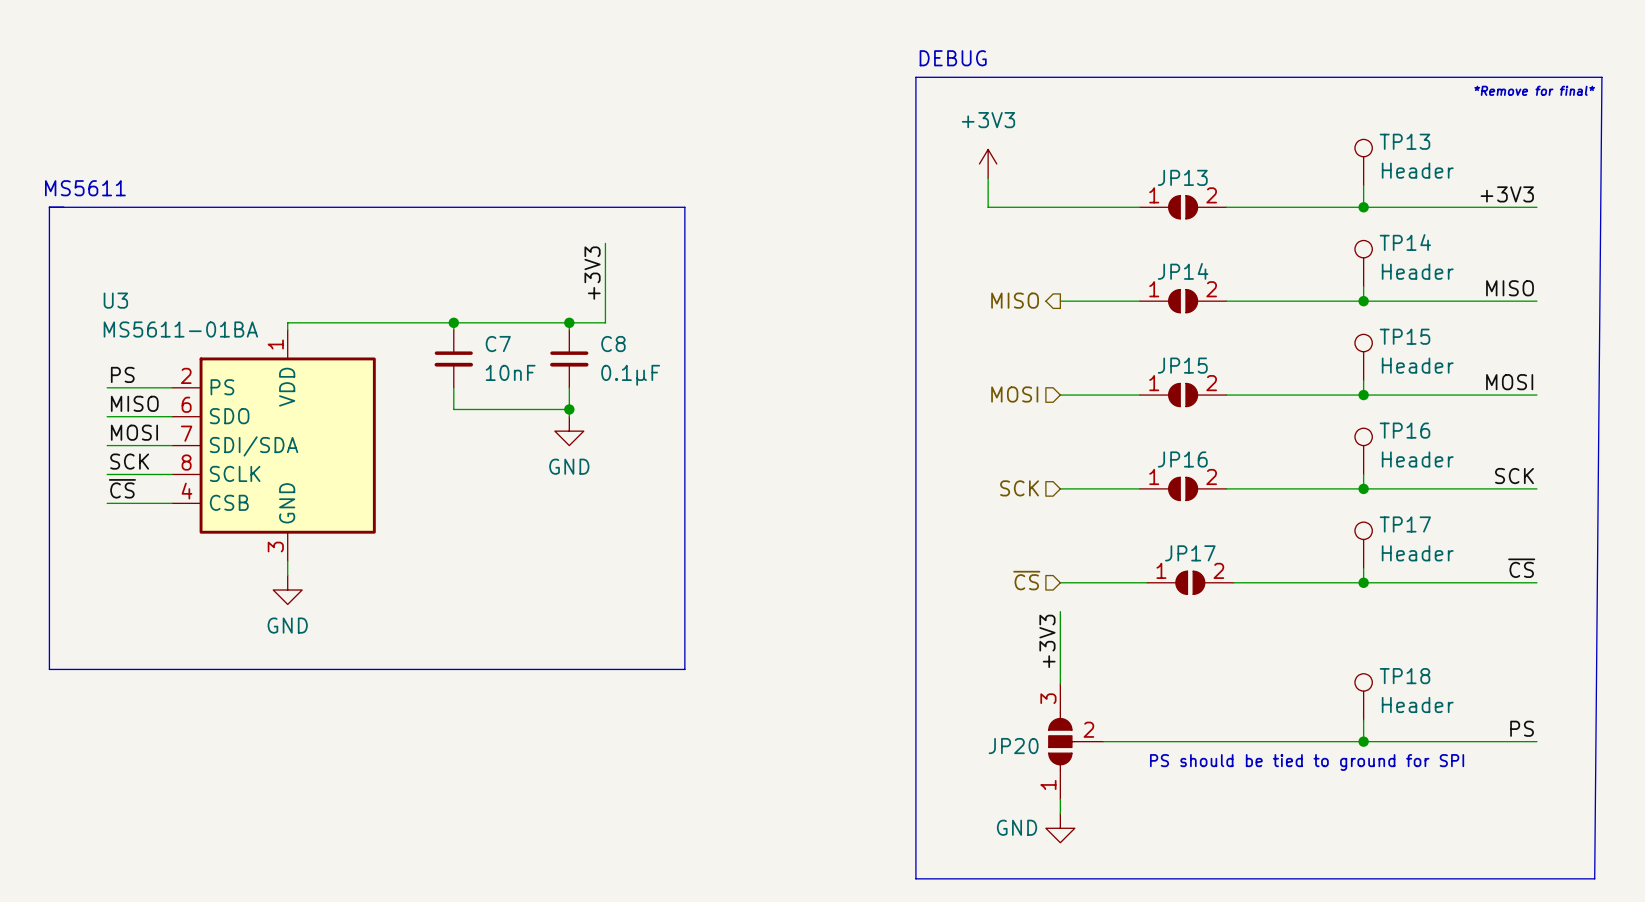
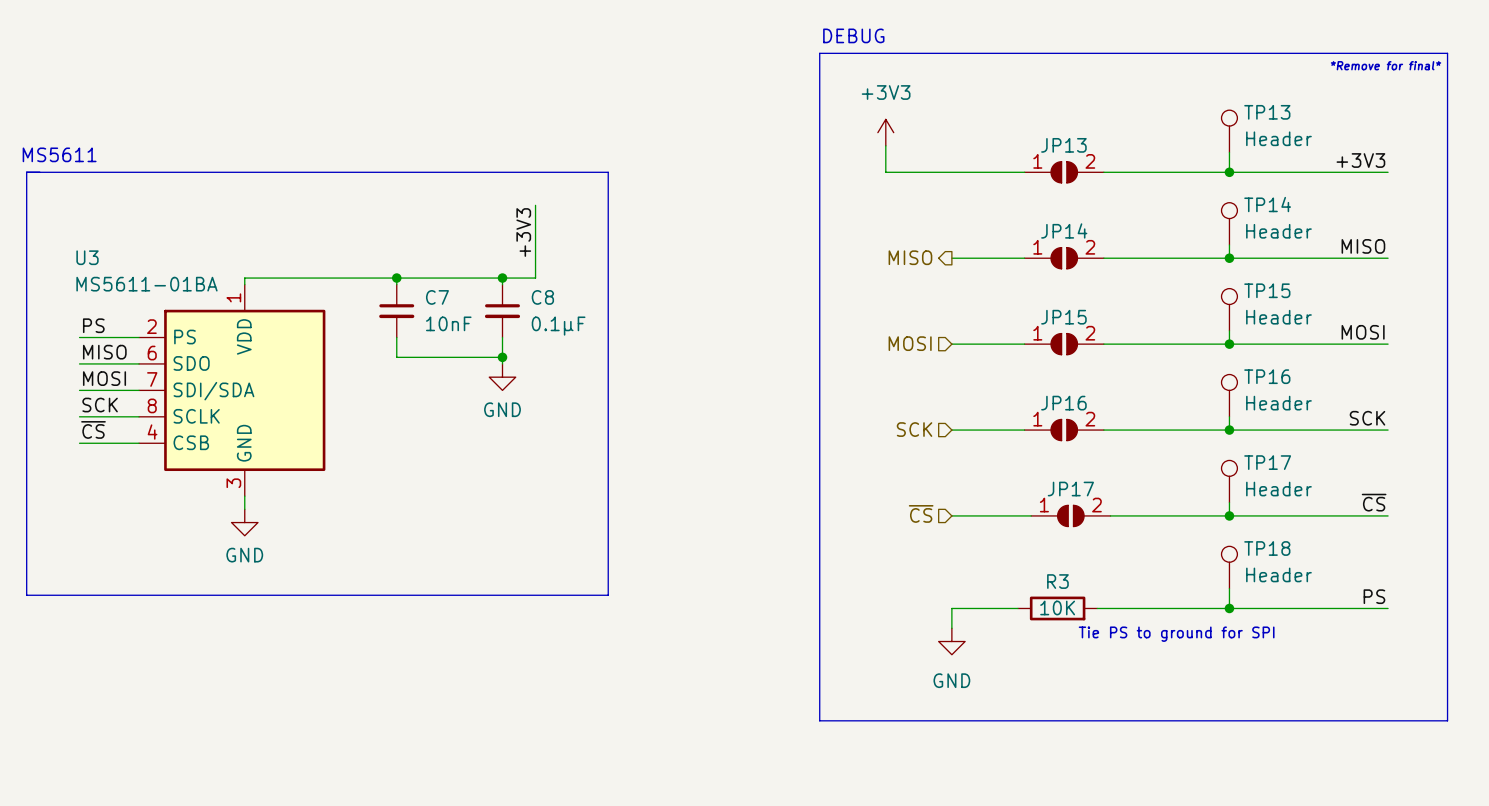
line: (1601, 77) (1594, 878) (915, 878) (915, 806) -> (1447, 53) (1447, 720) (819, 720)
wire: (1060, 611) (1060, 683) -> none
label: +3V3 (1047, 641) -> none
wire: none -> (1017, 608) (951, 608) (951, 628)
R3: none -> 10K (1057, 608)
wire: none -> (1097, 608) (1388, 608)
TP18 position: (1363, 696) -> (1229, 567)
text: none -> Tie PS to ground for SPI (1176, 634)
wire: (1363, 719) (1363, 741) -> (1229, 588) (1229, 608)
label position: PS (1522, 728) -> PS (1374, 596)
JP20: (1076, 741) -> none
wire: (1103, 741) (1536, 741) -> none
junction position: (1363, 741) -> (1229, 608)
text: PS should be tied to ground for SPI (1307, 762) -> none
wire: (1060, 799) (1060, 813) -> none
power symbol text position: GND (1017, 827) -> GND (951, 680)
power symbol position: GND (1060, 828) -> GND (951, 641)

